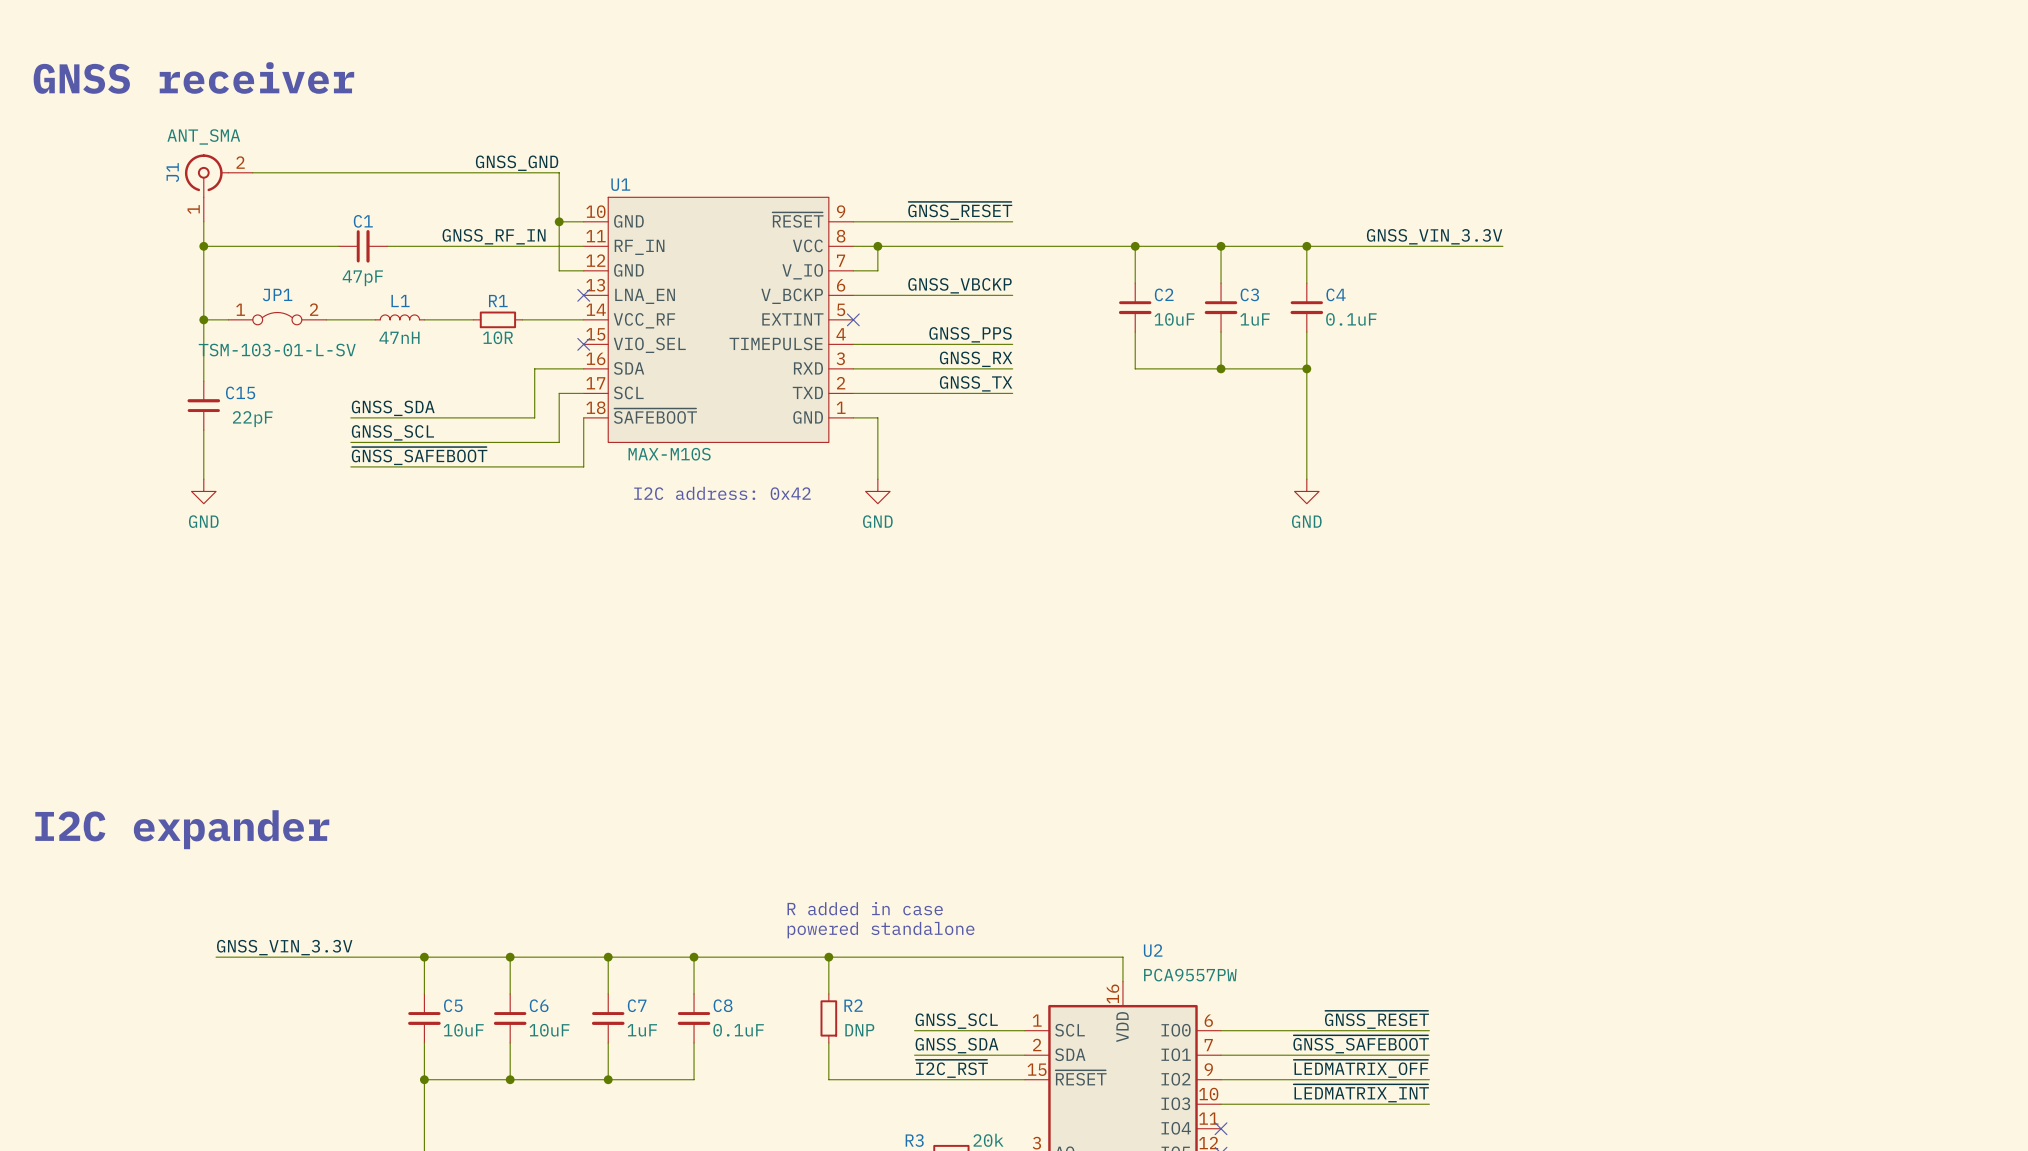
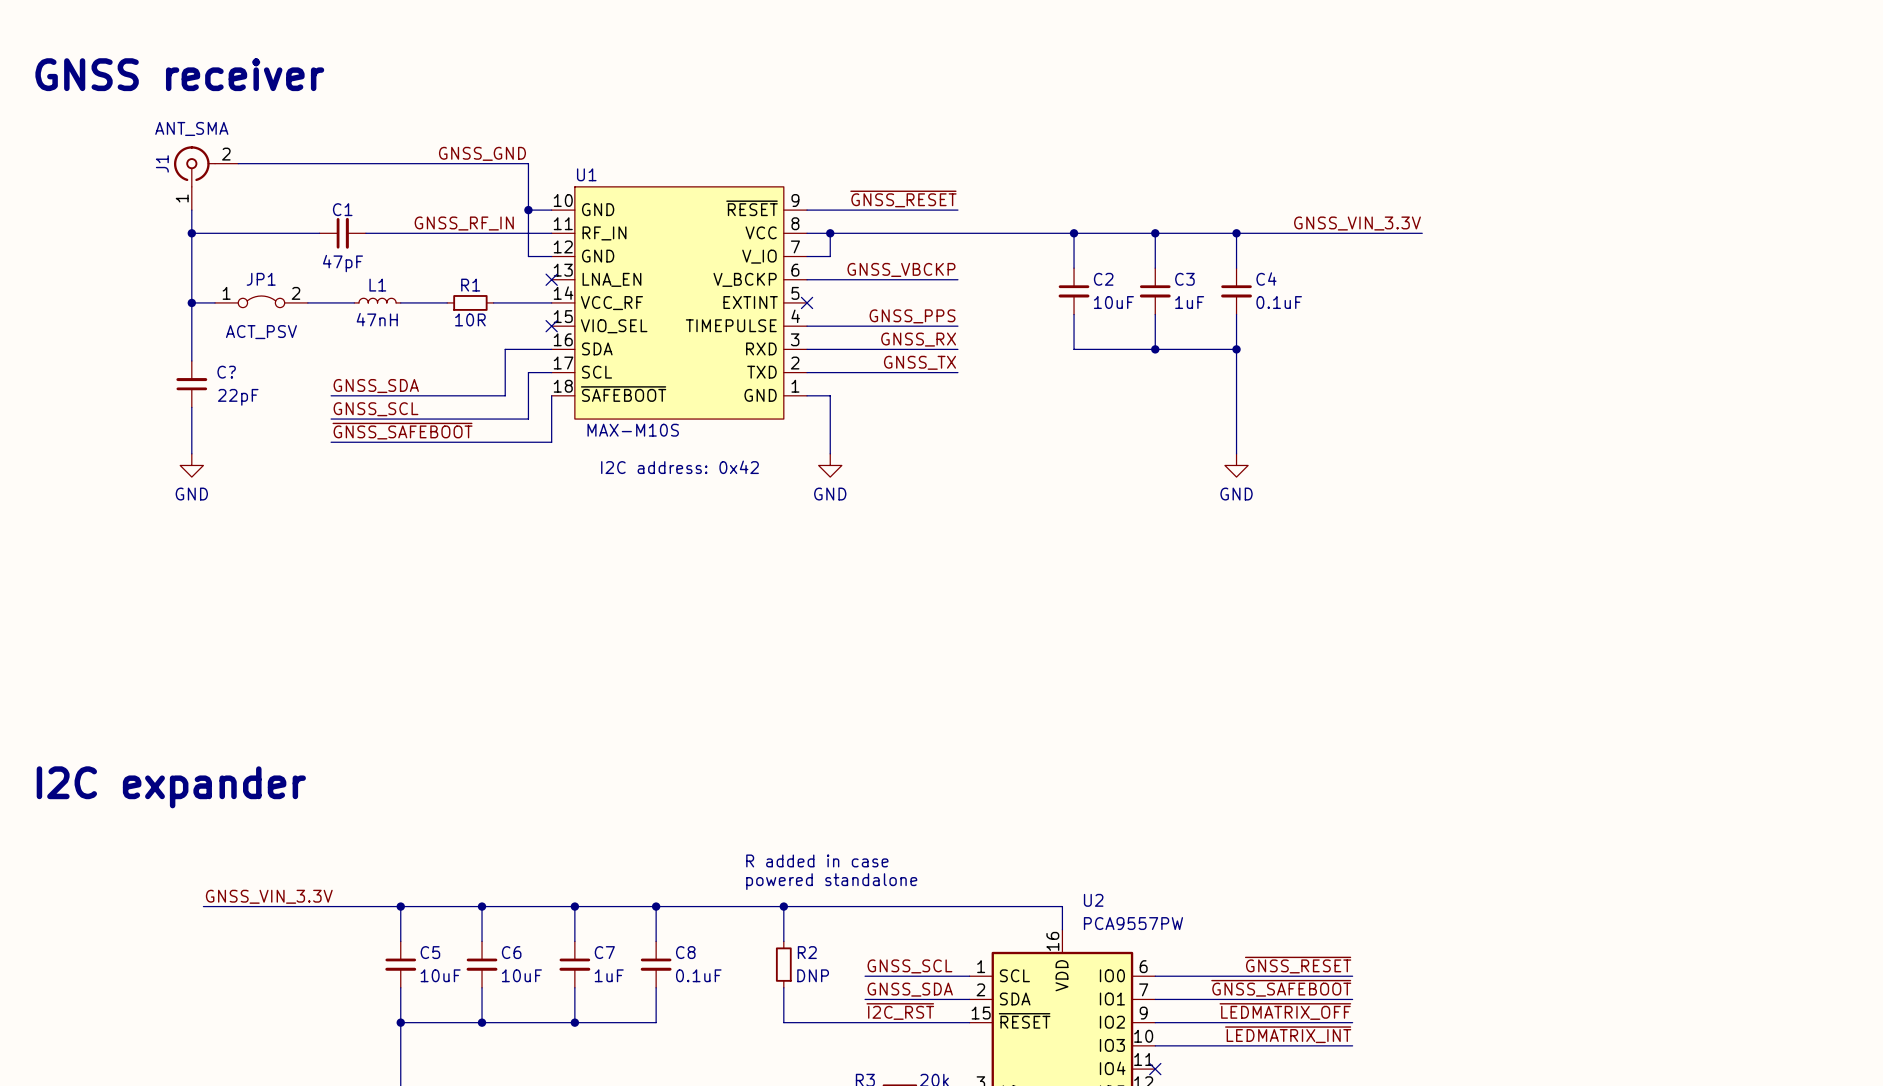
JP1 value: TSM-103-01-L-SV (277, 350) -> ACT_PSV (261, 332)
C15 name: C15 (240, 392) -> C? (226, 372)

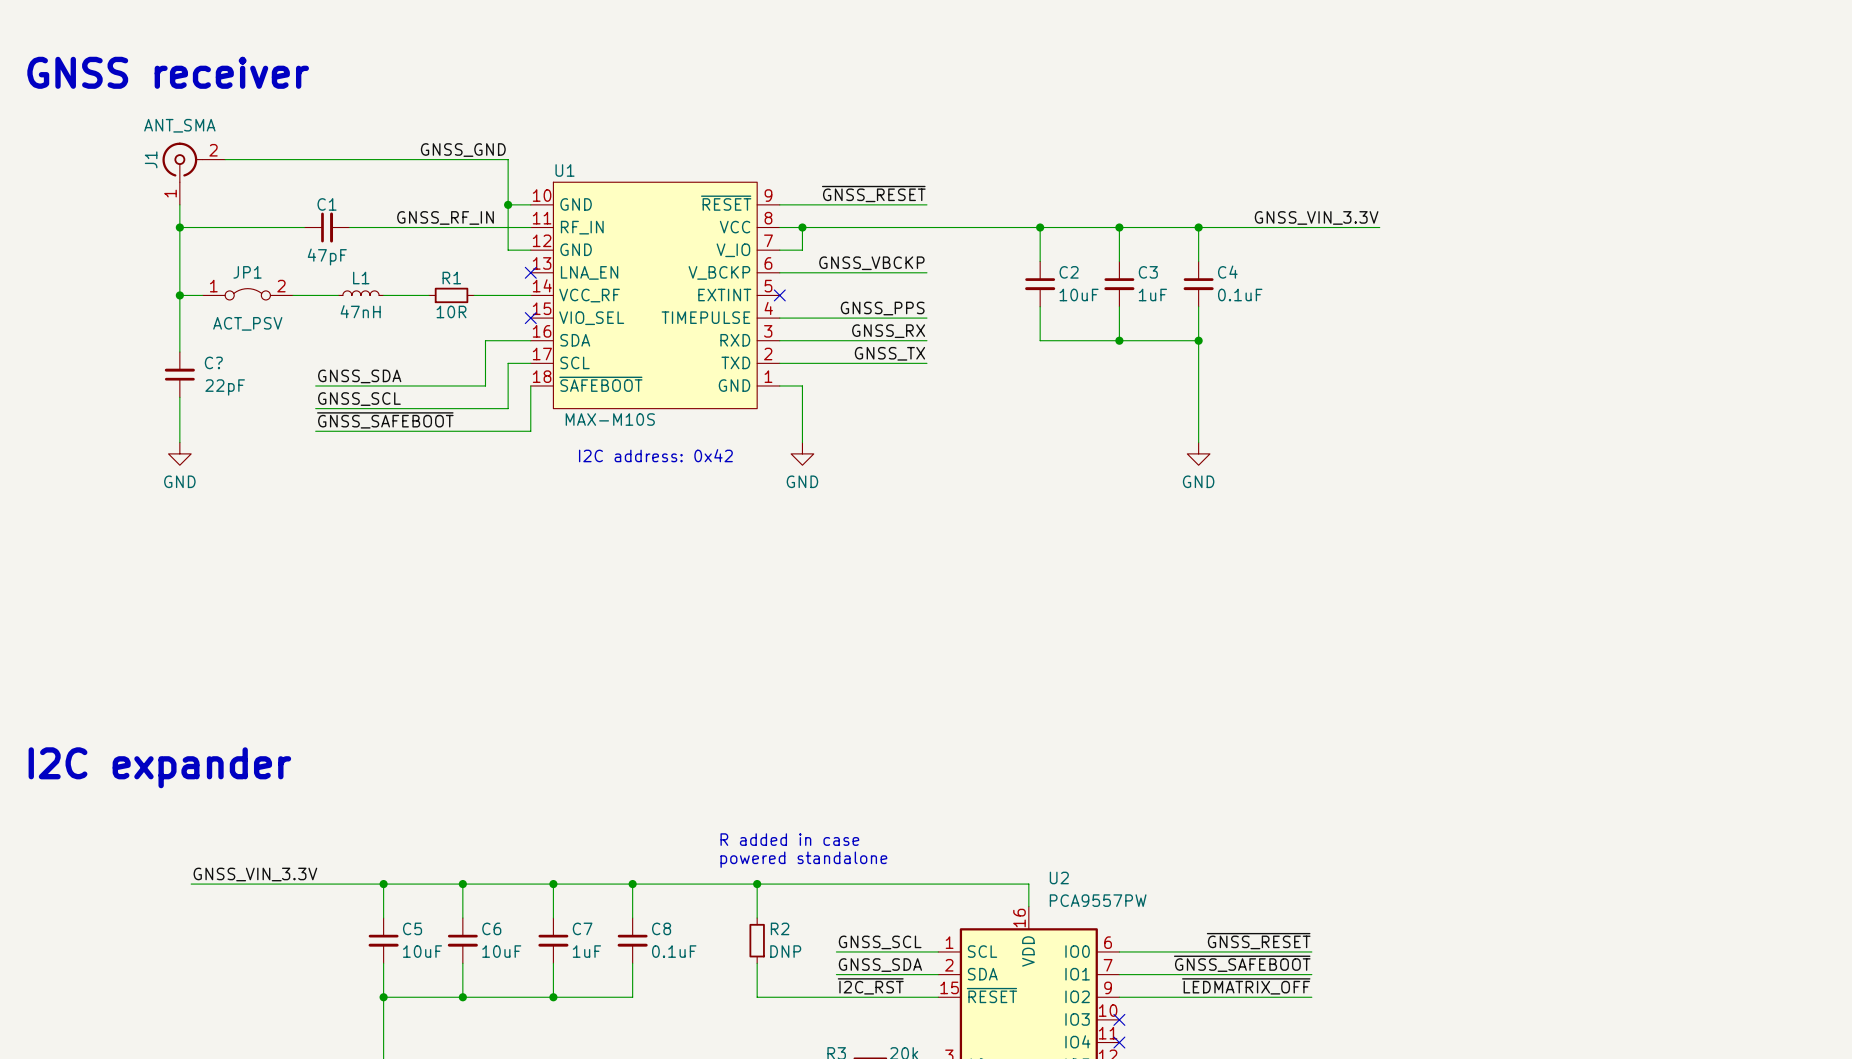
label: ~{LEDMATRIX_INT} (1288, 1034) -> none
wire: (1155, 1045) (1352, 1045) -> none
no-connect mark: none -> (1119, 1019)

